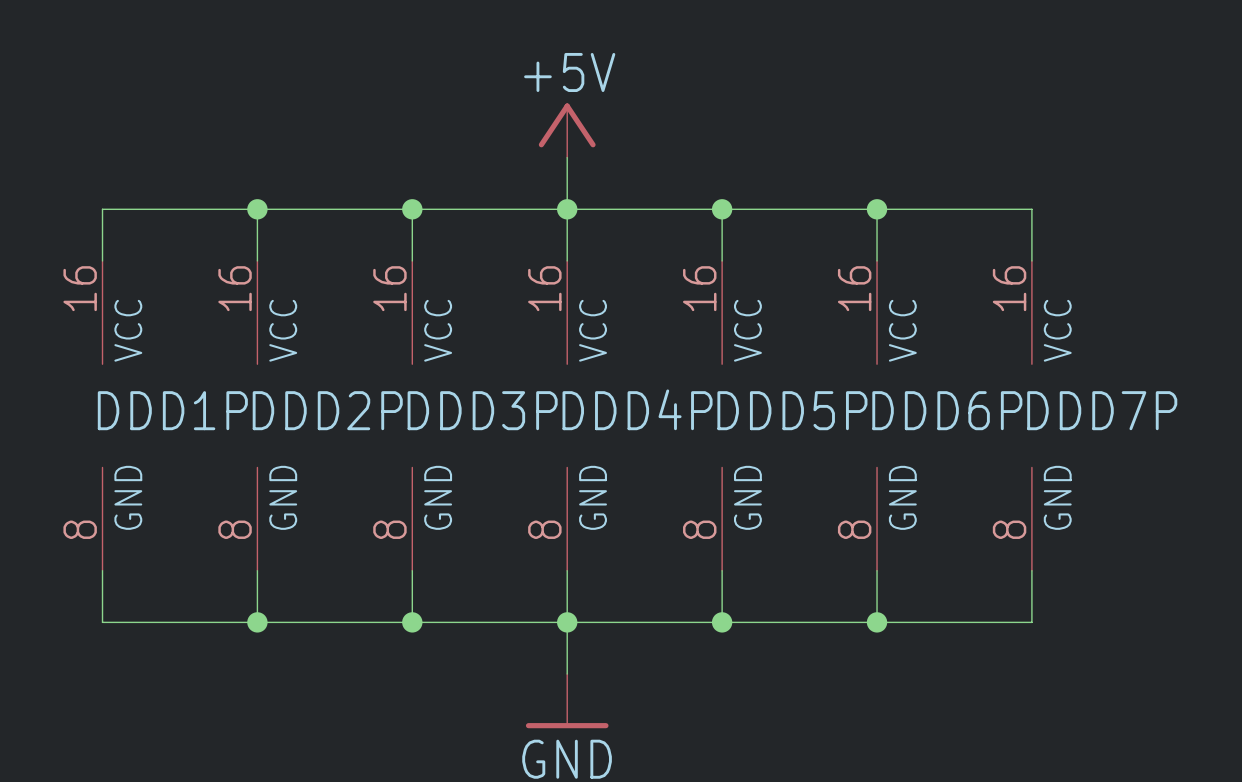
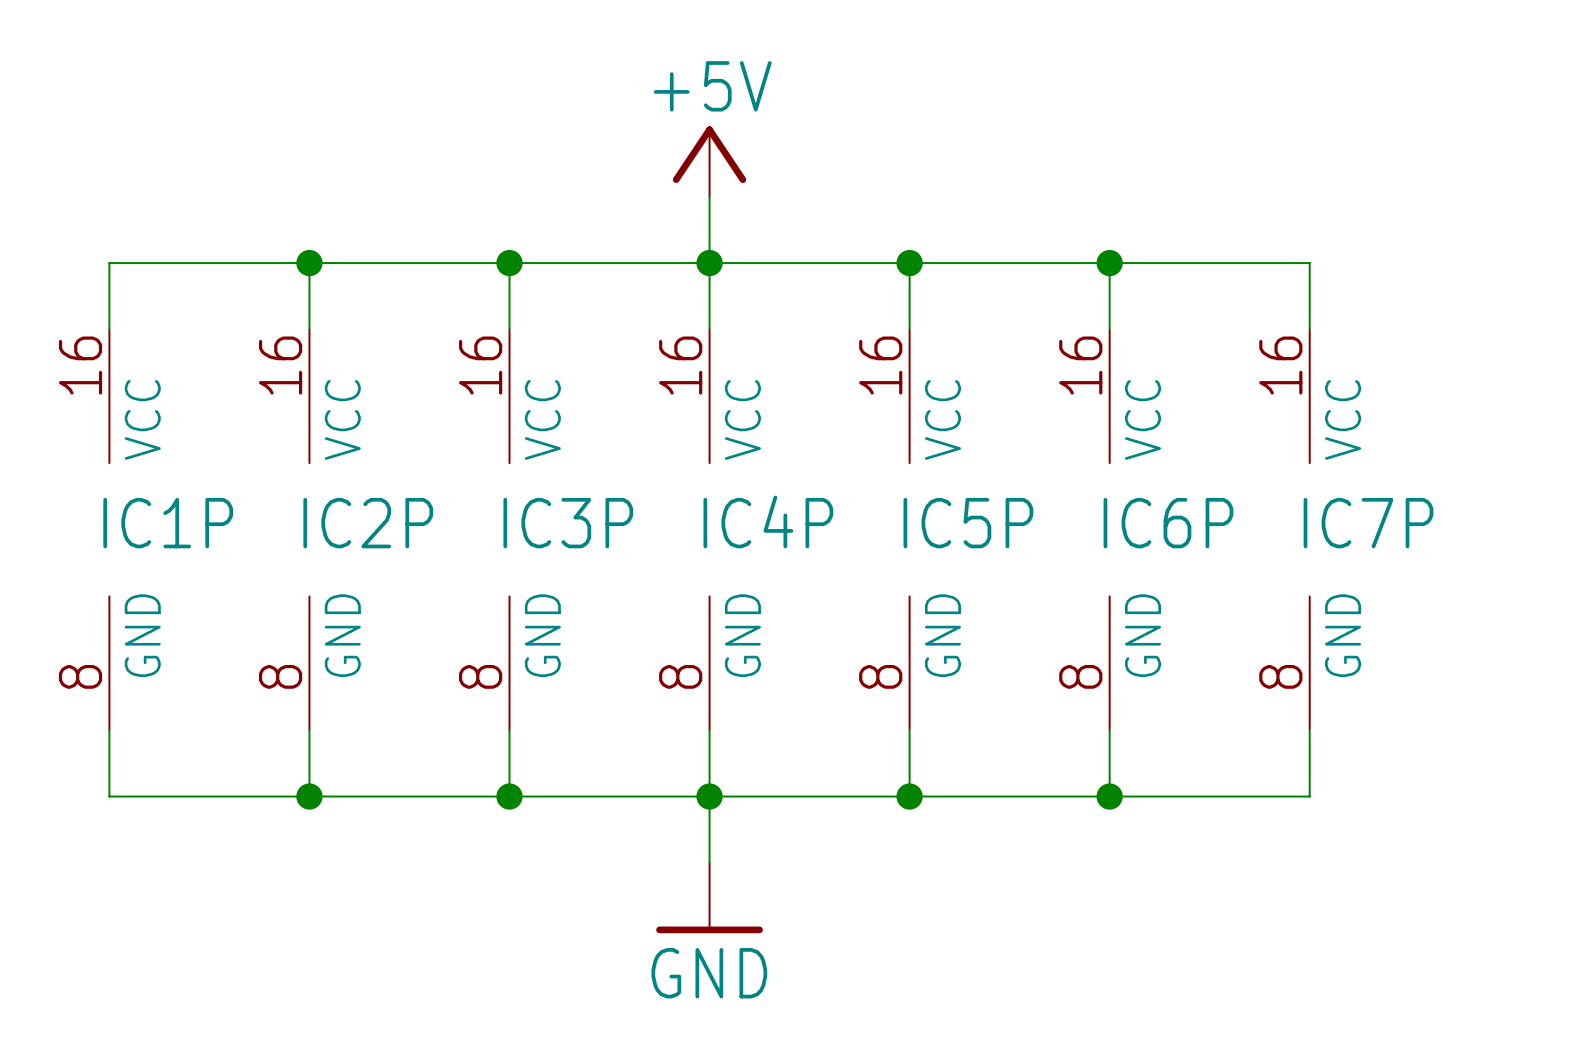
DDD4P name: DDD4P (637, 409) -> IC4P (768, 522)
DDD1P name: DDD1P (172, 410) -> IC1P (168, 523)
DDD2P name: DDD2P (327, 410) -> IC2P (368, 523)
DDD3P name: DDD3P (482, 410) -> IC3P (568, 523)
DDD5P name: DDD5P (792, 410) -> IC5P (968, 523)
DDD6P name: DDD6P (947, 410) -> IC6P (1168, 523)
DDD7P name: DDD7P (1102, 410) -> IC7P (1368, 523)

